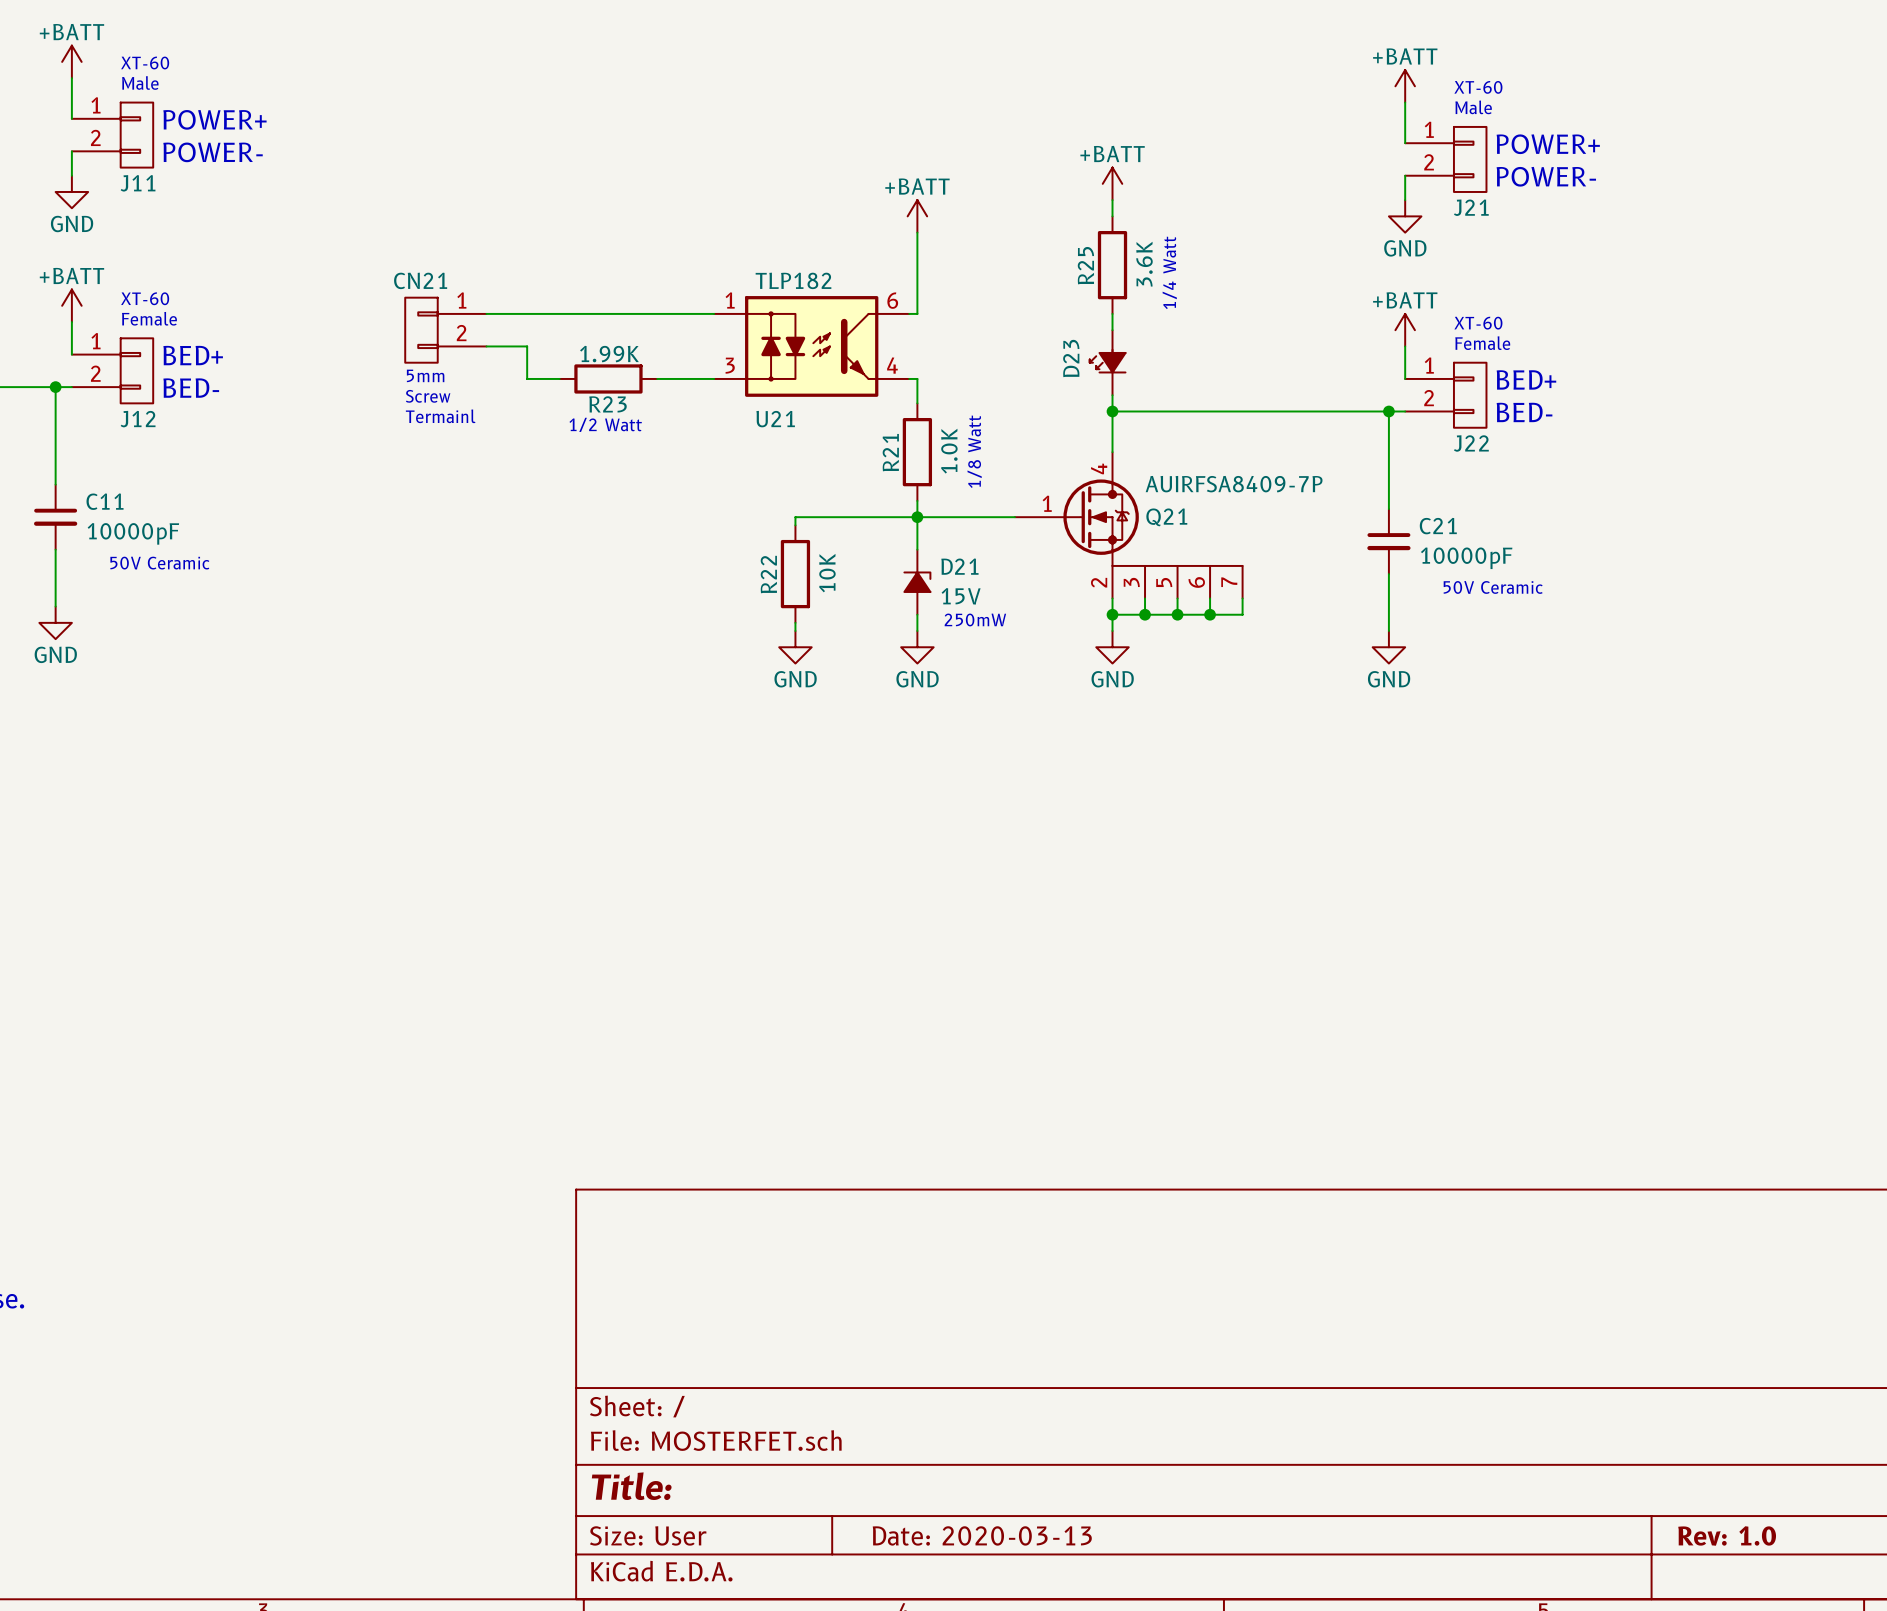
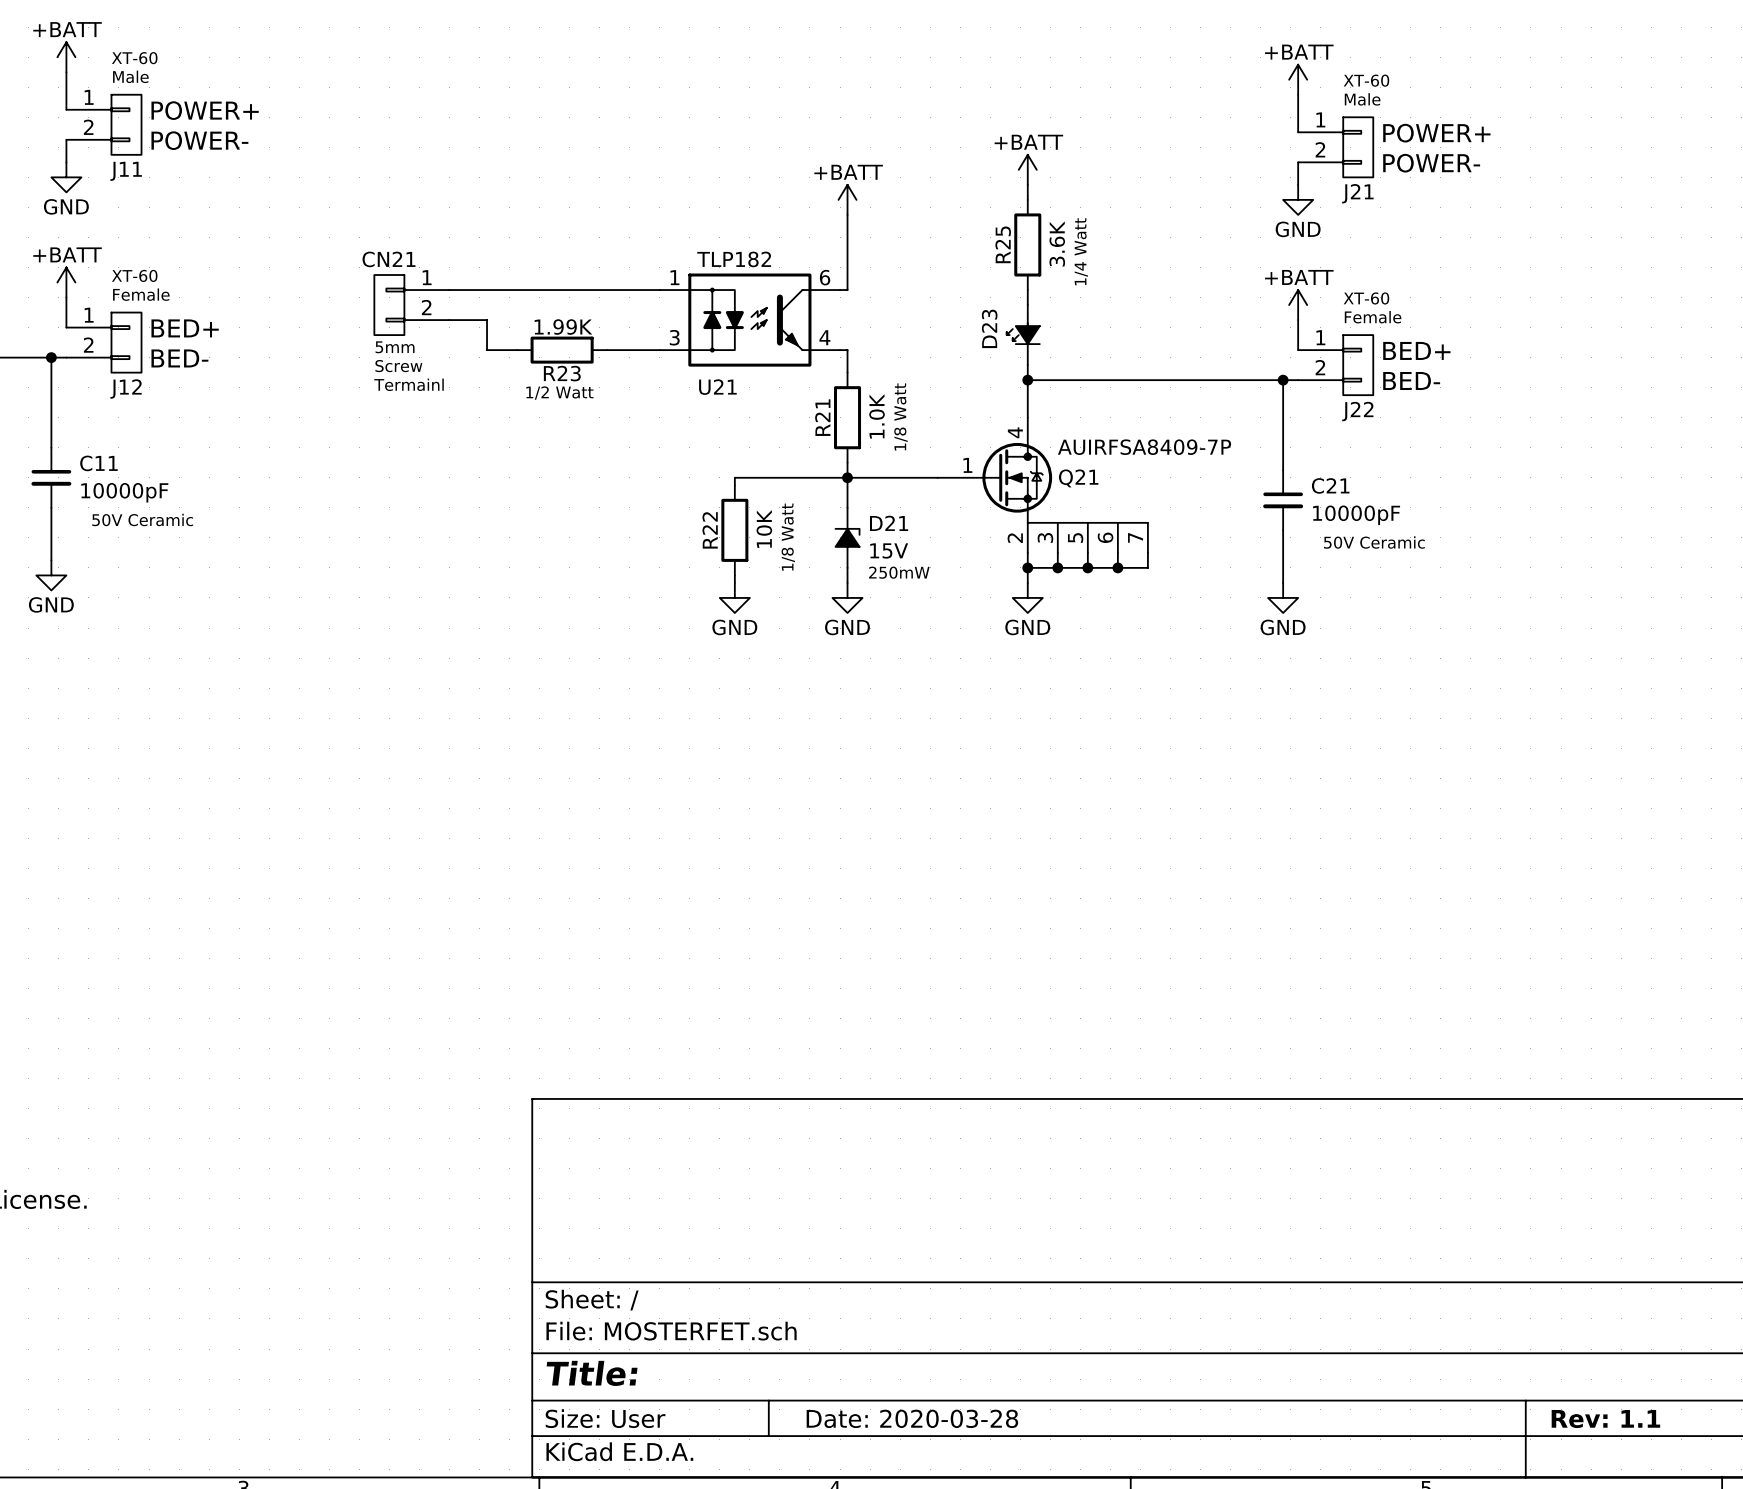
text: none -> 1/8 Watt (788, 537)
title block: Date: 2020-03-13 (982, 1535) -> Date: 2020-03-28 (912, 1418)
title block: Rev: 1.0 (1727, 1535) -> Rev: 1.1 (1605, 1419)

